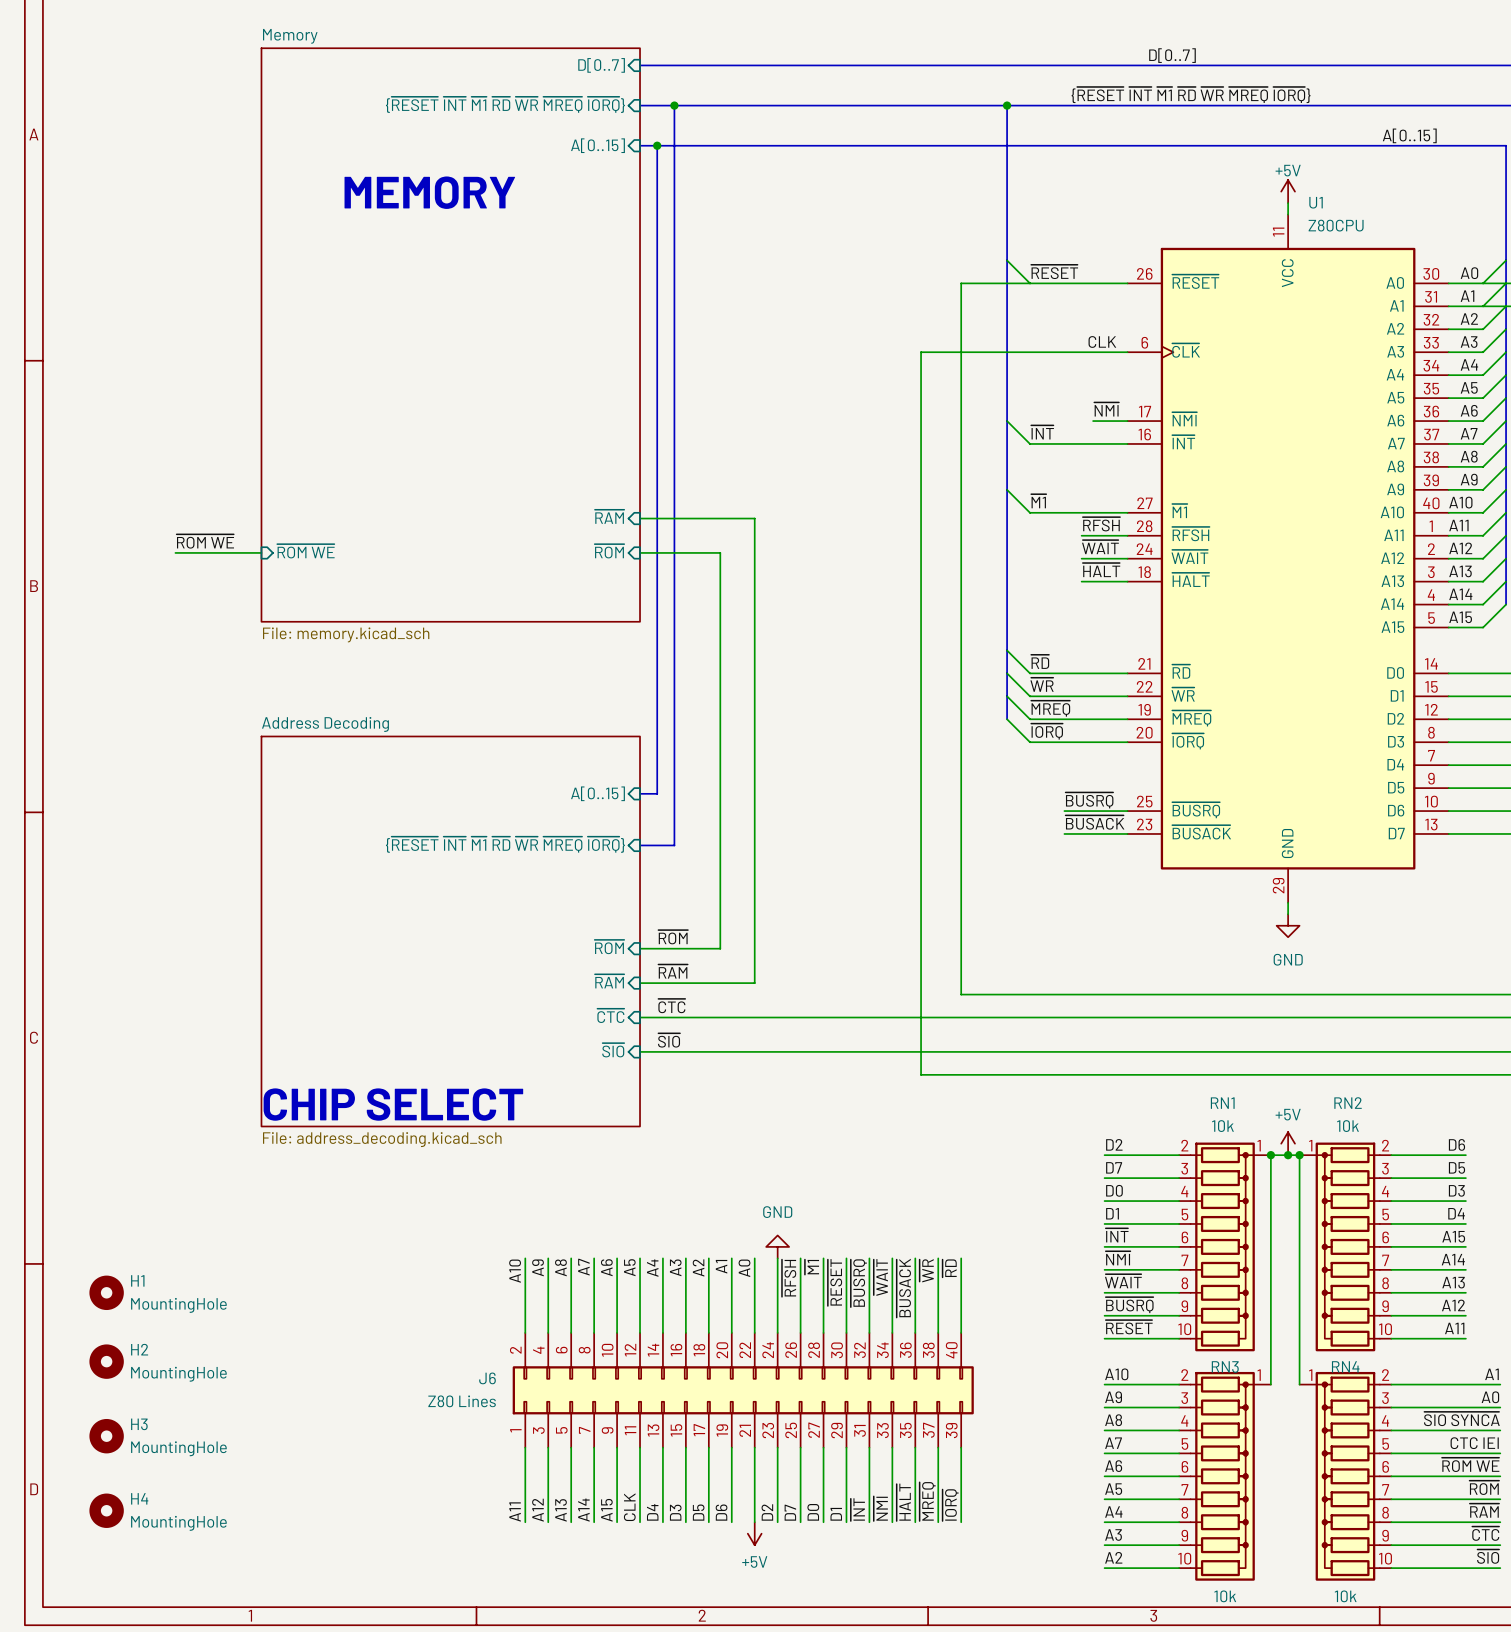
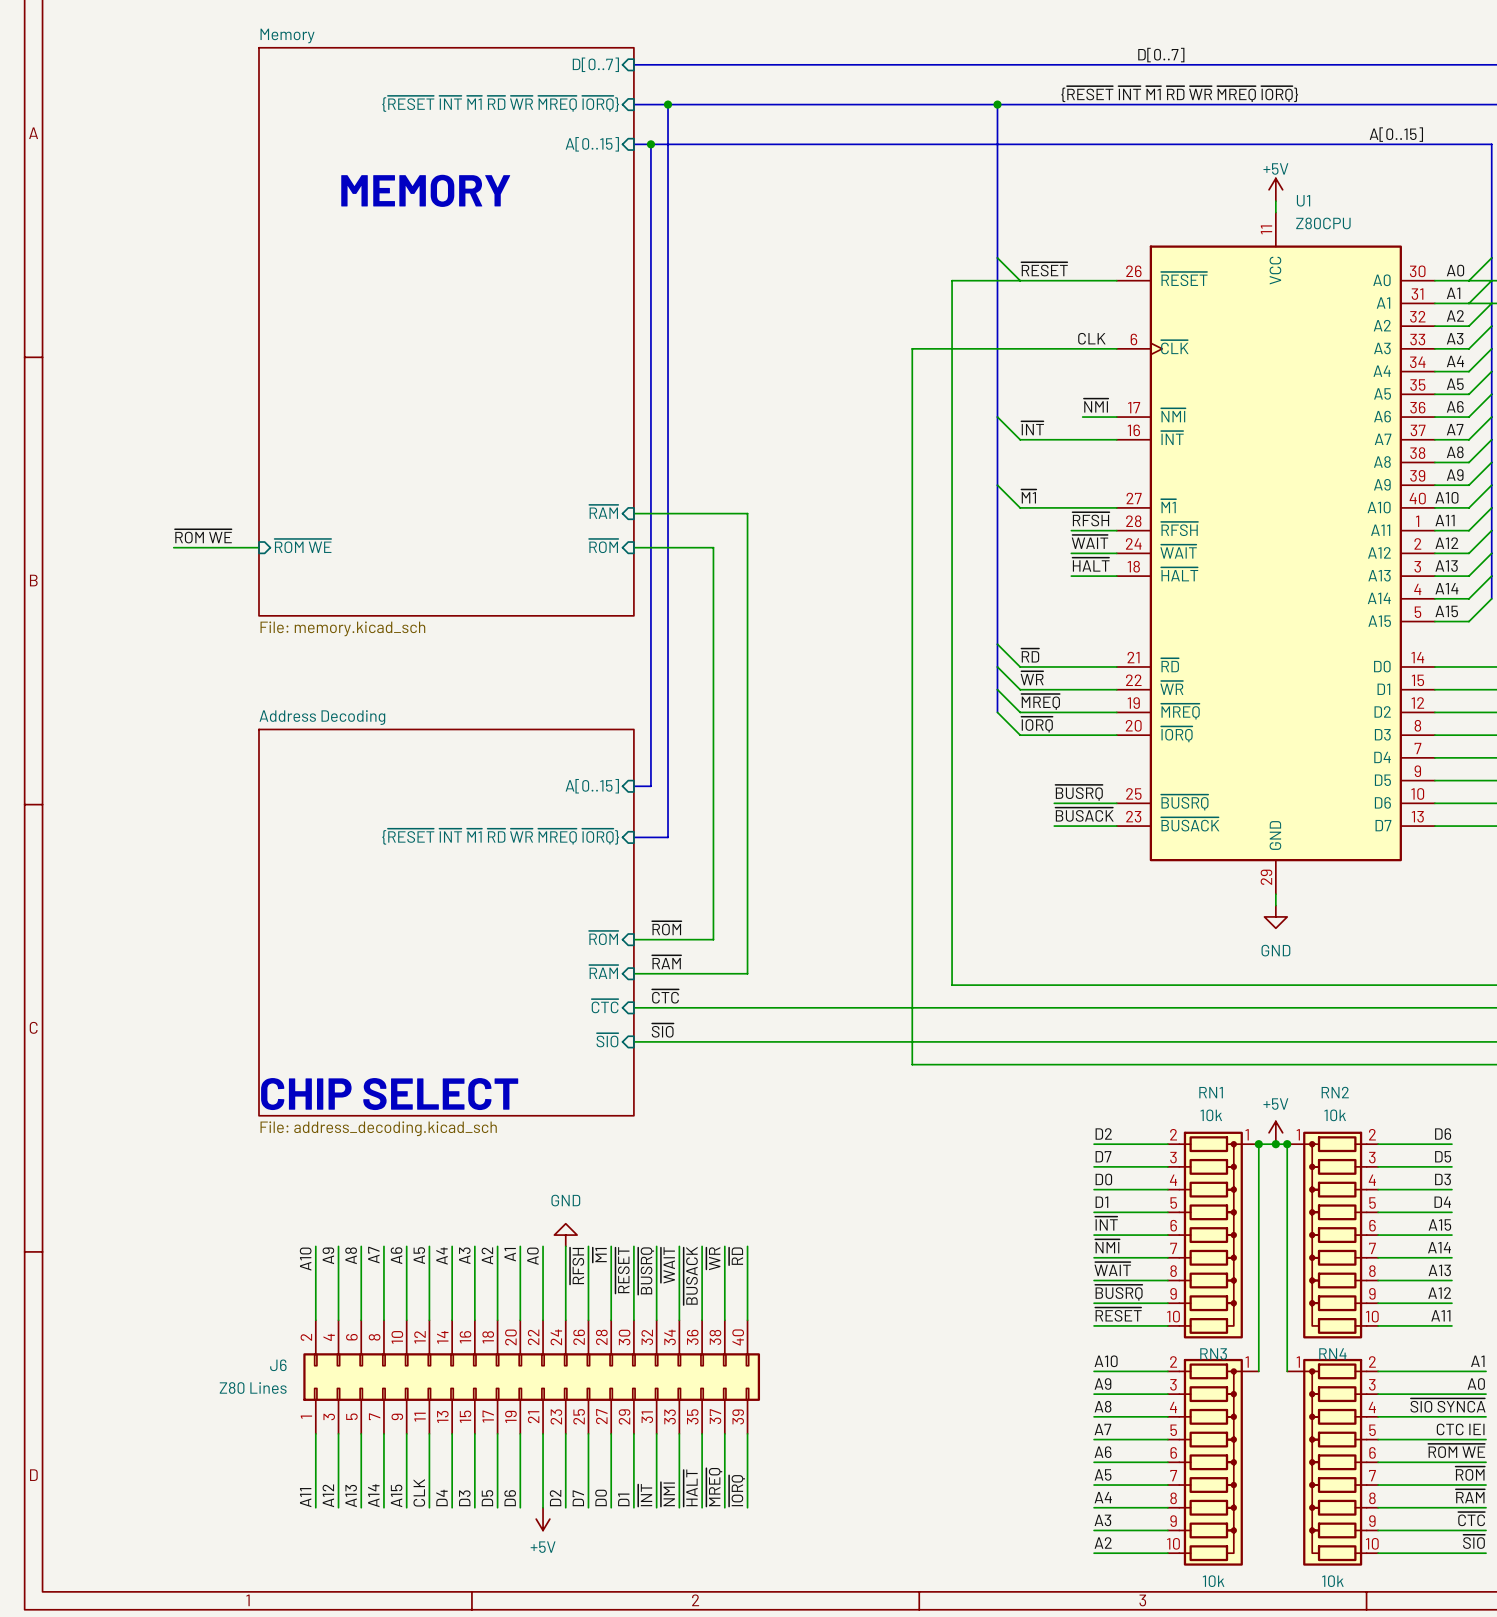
power symbol position: GND (777, 1246) -> GND (565, 1235)
wire: none -> (315, 1246) (315, 1320)
wire: none -> (338, 1246) (338, 1320)
wire: none -> (361, 1246) (361, 1320)
wire: none -> (383, 1246) (383, 1320)
wire: none -> (406, 1246) (406, 1320)
wire: none -> (429, 1246) (429, 1320)
wire: none -> (452, 1246) (452, 1320)
wire: none -> (474, 1246) (474, 1320)
wire: none -> (497, 1246) (497, 1320)
wire: (777, 1258) (777, 1332) -> none
wire: (800, 1258) (800, 1332) -> none
wire: (823, 1258) (823, 1332) -> none
wire: (846, 1258) (846, 1332) -> none
wire: (869, 1258) (869, 1332) -> none
wire: (892, 1258) (892, 1332) -> none
wire: (915, 1258) (915, 1332) -> none
wire: (938, 1258) (938, 1332) -> none
wire: (961, 1258) (961, 1332) -> none
label: A1 (721, 1266) -> ~{WR} (713, 1258)
label: none -> A9 (328, 1255)
label: none -> A7 (373, 1255)
label: none -> A6 (396, 1255)
label: none -> A5 (419, 1255)
label: none -> A3 (464, 1255)
label: none -> A2 (487, 1255)
label: A9 (538, 1267) -> A0 (532, 1256)
label position: A8 (560, 1267) -> A8 (351, 1255)
label: A7 (583, 1267) -> ~{RFSH} (577, 1266)
label: A6 (606, 1267) -> ~{M1} (599, 1255)
label: A5 (629, 1267) -> ~{RESET} (622, 1270)
label: A3 (675, 1267) -> ~{WAIT} (667, 1265)
label: A2 (698, 1267) -> ~{BUSACK} (690, 1275)
label: ~{M1} (811, 1267) -> none
label: none -> A4 (442, 1256)
label: A4 (652, 1268) -> ~{BUSRQ} (646, 1271)
label: A0 (744, 1268) -> ~{RD} (736, 1256)
label: ~{RD} (949, 1268) -> none
label: ~{WR} (926, 1270) -> none
label: none -> A10 (305, 1259)
label: A10 (515, 1271) -> A1 (510, 1254)
label: ~{WAIT} (880, 1277) -> none
label: ~{RFSH} (789, 1278) -> none
label: ~{RESET} (834, 1282) -> none
label: ~{BUSRQ} (858, 1283) -> none
label: ~{BUSACK} (903, 1288) -> none
H1: MountingHole (106, 1292) -> none
H2: MountingHole (106, 1361) -> none
J6 position: (743, 1390) -> (531, 1377)
H3: MountingHole (106, 1436) -> none
wire: none -> (315, 1433) (315, 1507)
wire: none -> (338, 1433) (338, 1507)
wire: none -> (361, 1433) (361, 1507)
wire: none -> (383, 1433) (383, 1507)
wire: none -> (406, 1433) (406, 1507)
wire: none -> (429, 1433) (429, 1507)
wire: none -> (452, 1433) (452, 1507)
wire: none -> (474, 1433) (474, 1507)
wire: none -> (497, 1433) (497, 1507)
wire: (777, 1447) (777, 1522) -> none
wire: (800, 1447) (800, 1522) -> none
wire: (823, 1447) (823, 1522) -> none
wire: (846, 1447) (846, 1522) -> none
wire: (869, 1447) (869, 1522) -> none
wire: (892, 1447) (892, 1522) -> none
wire: (915, 1447) (915, 1522) -> none
wire: (938, 1447) (938, 1522) -> none
wire: (961, 1447) (961, 1522) -> none
label: ~{MREQ} (927, 1501) -> none
label: ~{HALT} (903, 1502) -> none
label position: ~{IORQ} (950, 1505) -> ~{IORQ} (737, 1490)
label: none -> CLK (419, 1492)
label: CLK (629, 1507) -> D1 (623, 1499)
label: ~{NMI} (880, 1508) -> none
label: ~{INT} (857, 1509) -> none
H4: MountingHole (106, 1510) -> none
label: none -> A13 (351, 1496)
label: none -> A14 (373, 1495)
label: none -> A15 (396, 1495)
label position: A12 (537, 1510) -> A12 (328, 1495)
label: A13 (561, 1510) -> D2 (555, 1498)
label: A14 (583, 1510) -> D7 (578, 1498)
label: A15 (606, 1510) -> D0 (601, 1497)
label: none -> A11 (305, 1497)
label: none -> D4 (442, 1497)
label: none -> D3 (464, 1498)
label: none -> D5 (487, 1498)
label: A11 (515, 1512) -> D6 (510, 1498)
label: D4 (652, 1512) -> ~{INT} (645, 1495)
label: D3 (675, 1512) -> ~{NMI} (667, 1494)
label: D5 (698, 1512) -> ~{HALT} (690, 1488)
label: D6 (721, 1512) -> ~{MREQ} (714, 1487)
label: D2 (767, 1512) -> none
label: D7 (790, 1512) -> none
label: D0 (813, 1512) -> none
label: D1 (836, 1514) -> none
power symbol position: +5V (754, 1533) -> +5V (543, 1519)

